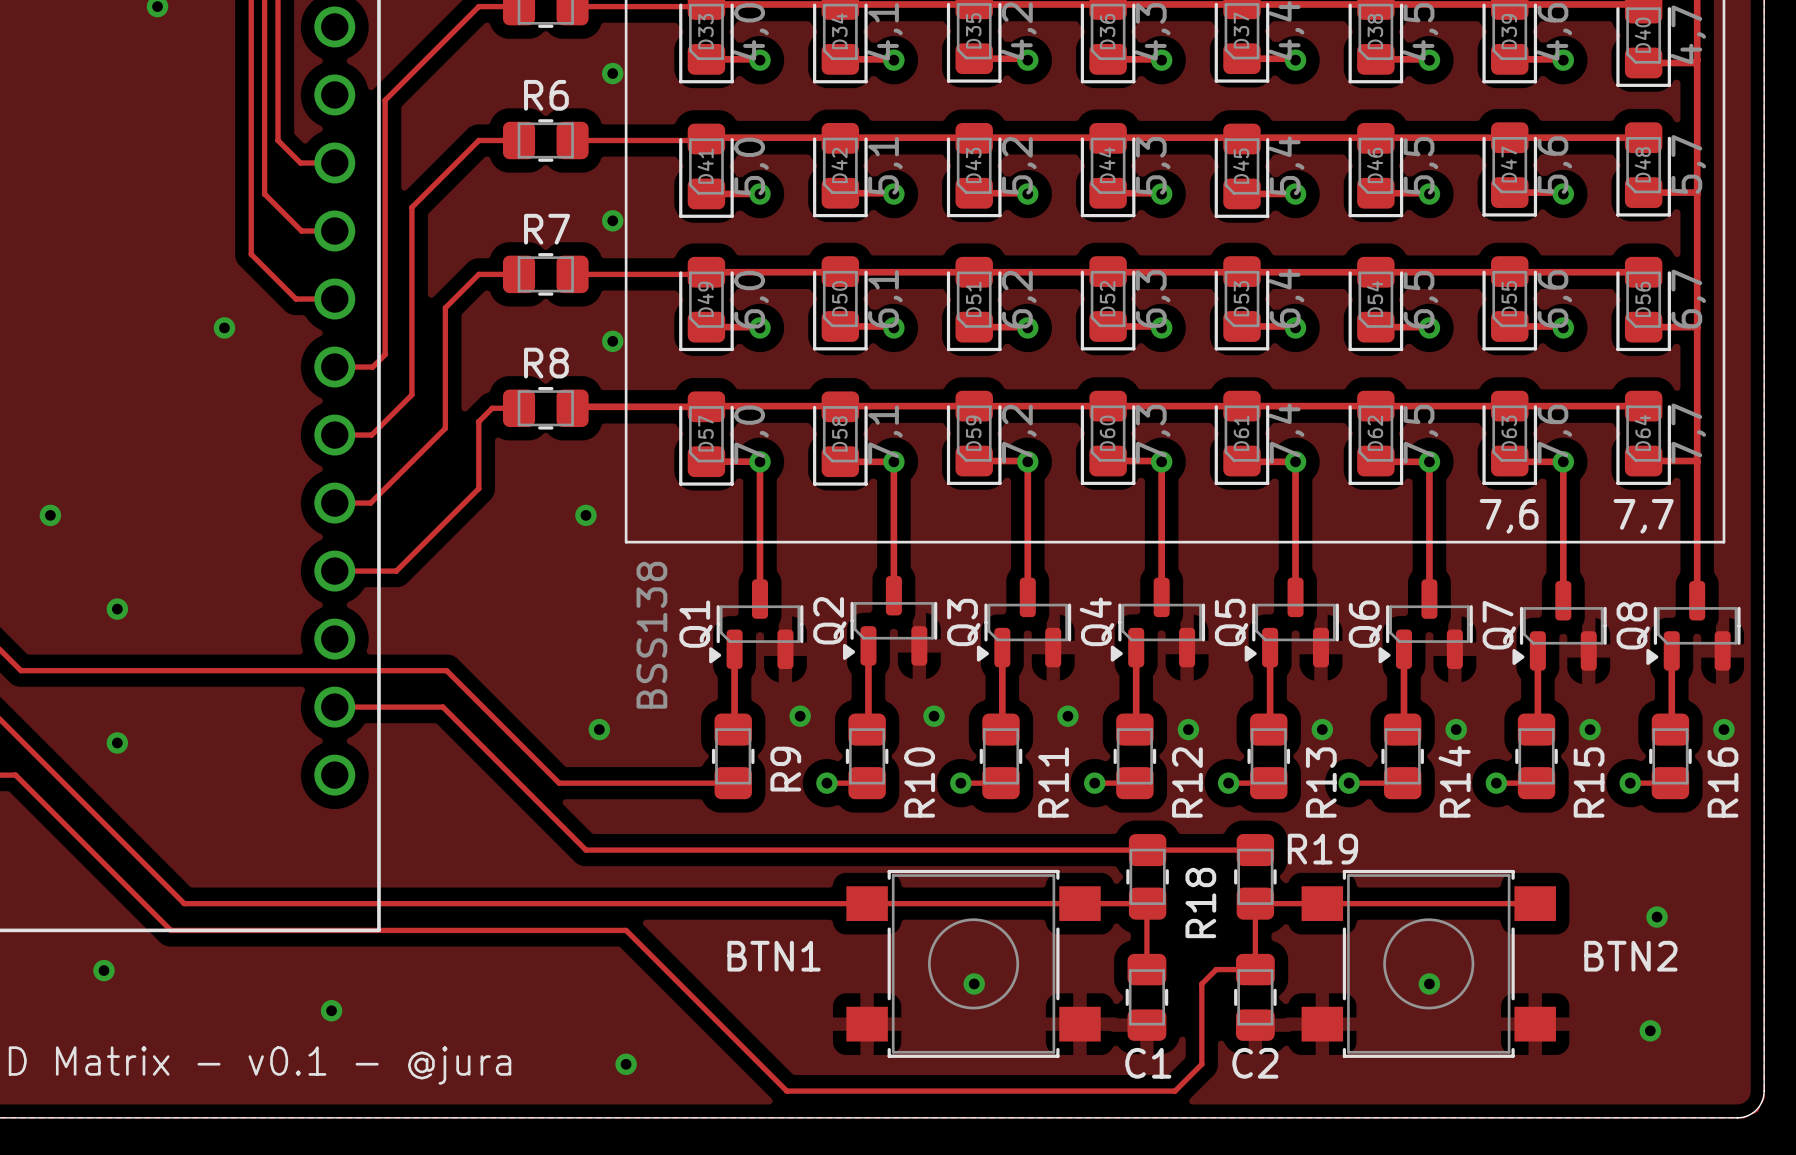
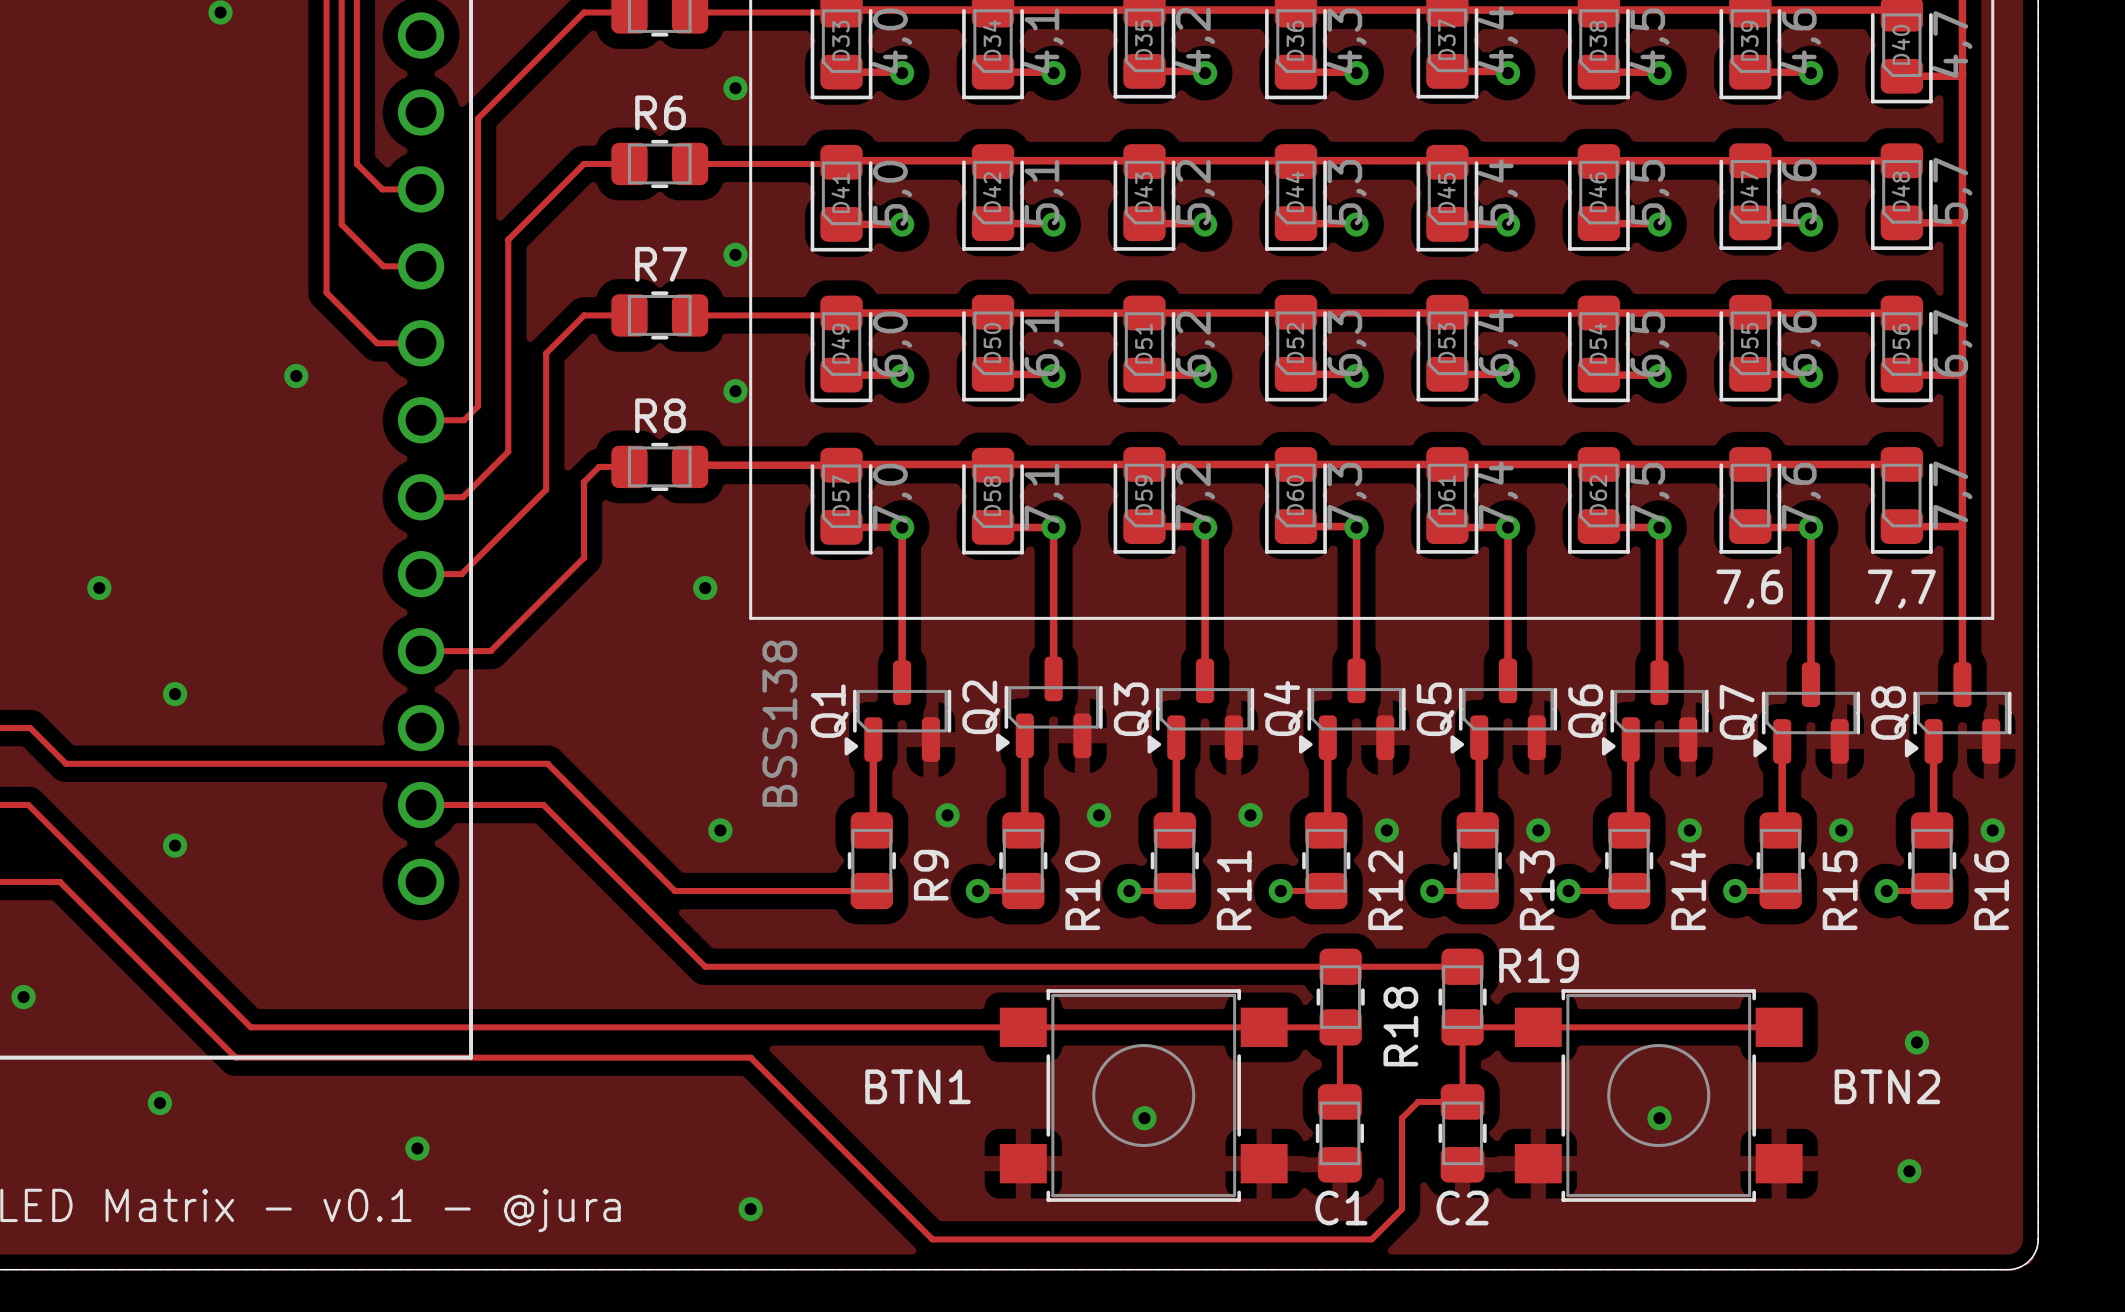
D64 name: D64 (1642, 432) -> 7,7 (1901, 589)
D63 name: D63 (1509, 433) -> 7,6 (1749, 589)

